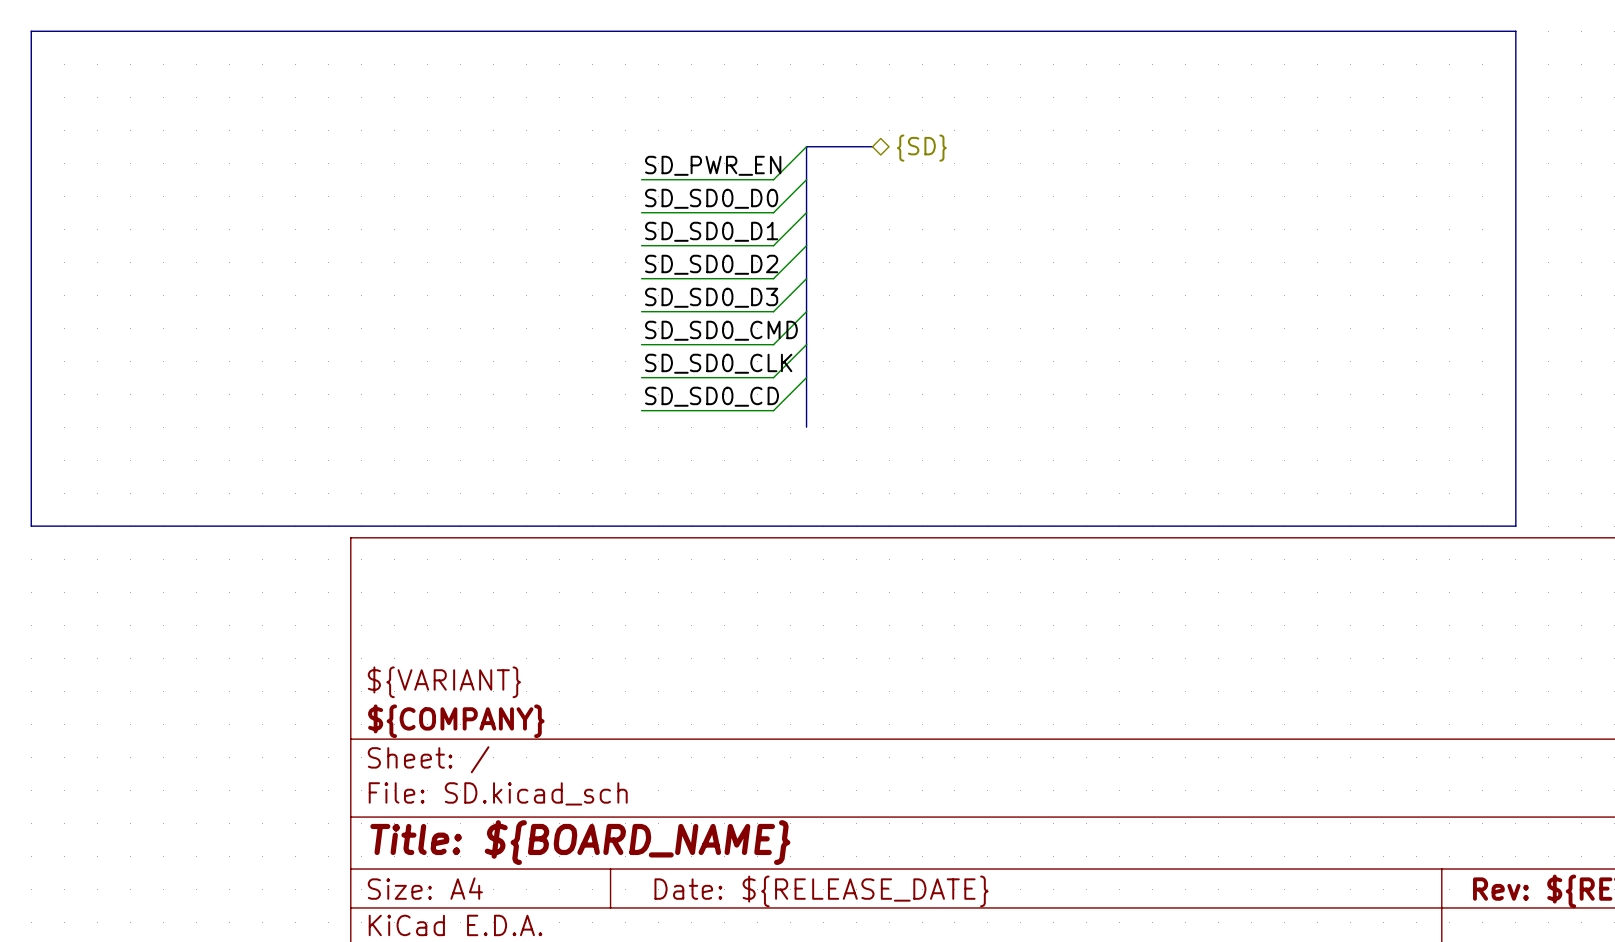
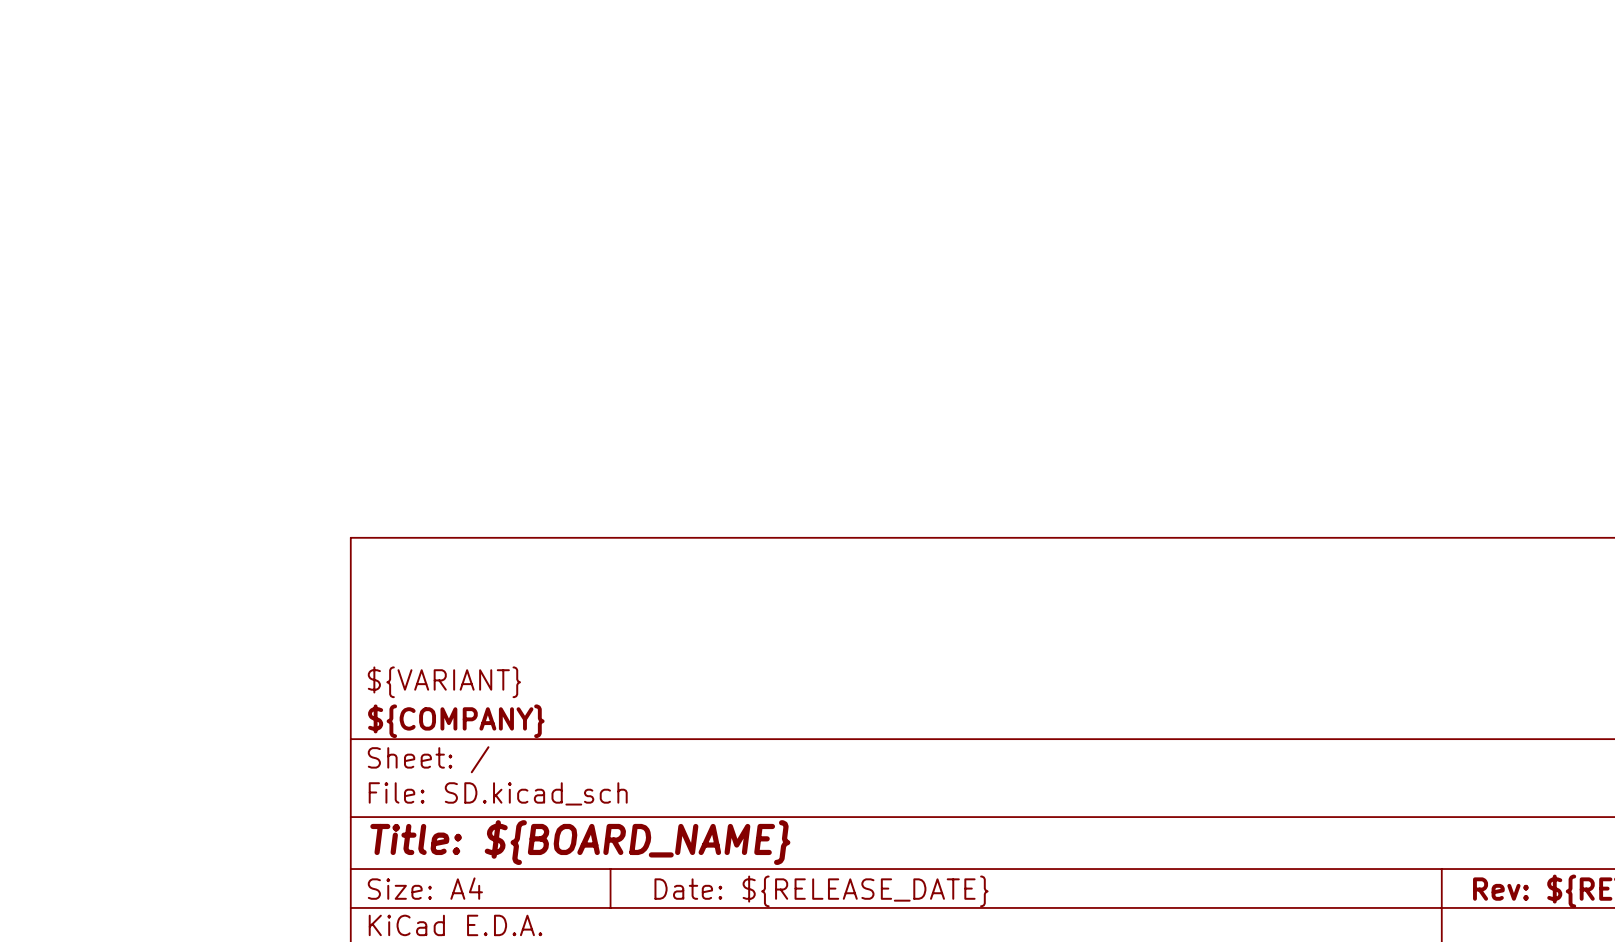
line: (31, 31) (1515, 31) (1515, 526) (31, 526) (31, 31) -> none
wire: (806, 146) (773, 179) (641, 179) -> none
bus: (872, 146) (806, 146) (806, 427) -> none
hierarchical label: {SD} (921, 148) -> none
label: SD_PWR_EN (713, 165) -> none
wire: (806, 179) (773, 212) (641, 212) -> none
label: SD_SD0_D0 (711, 198) -> none
wire: (806, 212) (773, 245) (641, 245) -> none
label: SD_SD0_D1 (711, 231) -> none
wire: (806, 245) (773, 278) (641, 278) -> none
label: SD_SD0_D2 (711, 264) -> none
wire: (806, 278) (773, 311) (641, 311) -> none
label: SD_SD0_D3 (711, 297) -> none
wire: (806, 311) (773, 344) (641, 344) -> none
label: SD_SD0_CMD (721, 330) -> none
wire: (806, 344) (773, 377) (641, 377) -> none
label: SD_SD0_CLK (718, 363) -> none
wire: (806, 377) (773, 410) (641, 410) -> none
label: SD_SD0_CD (712, 396) -> none

